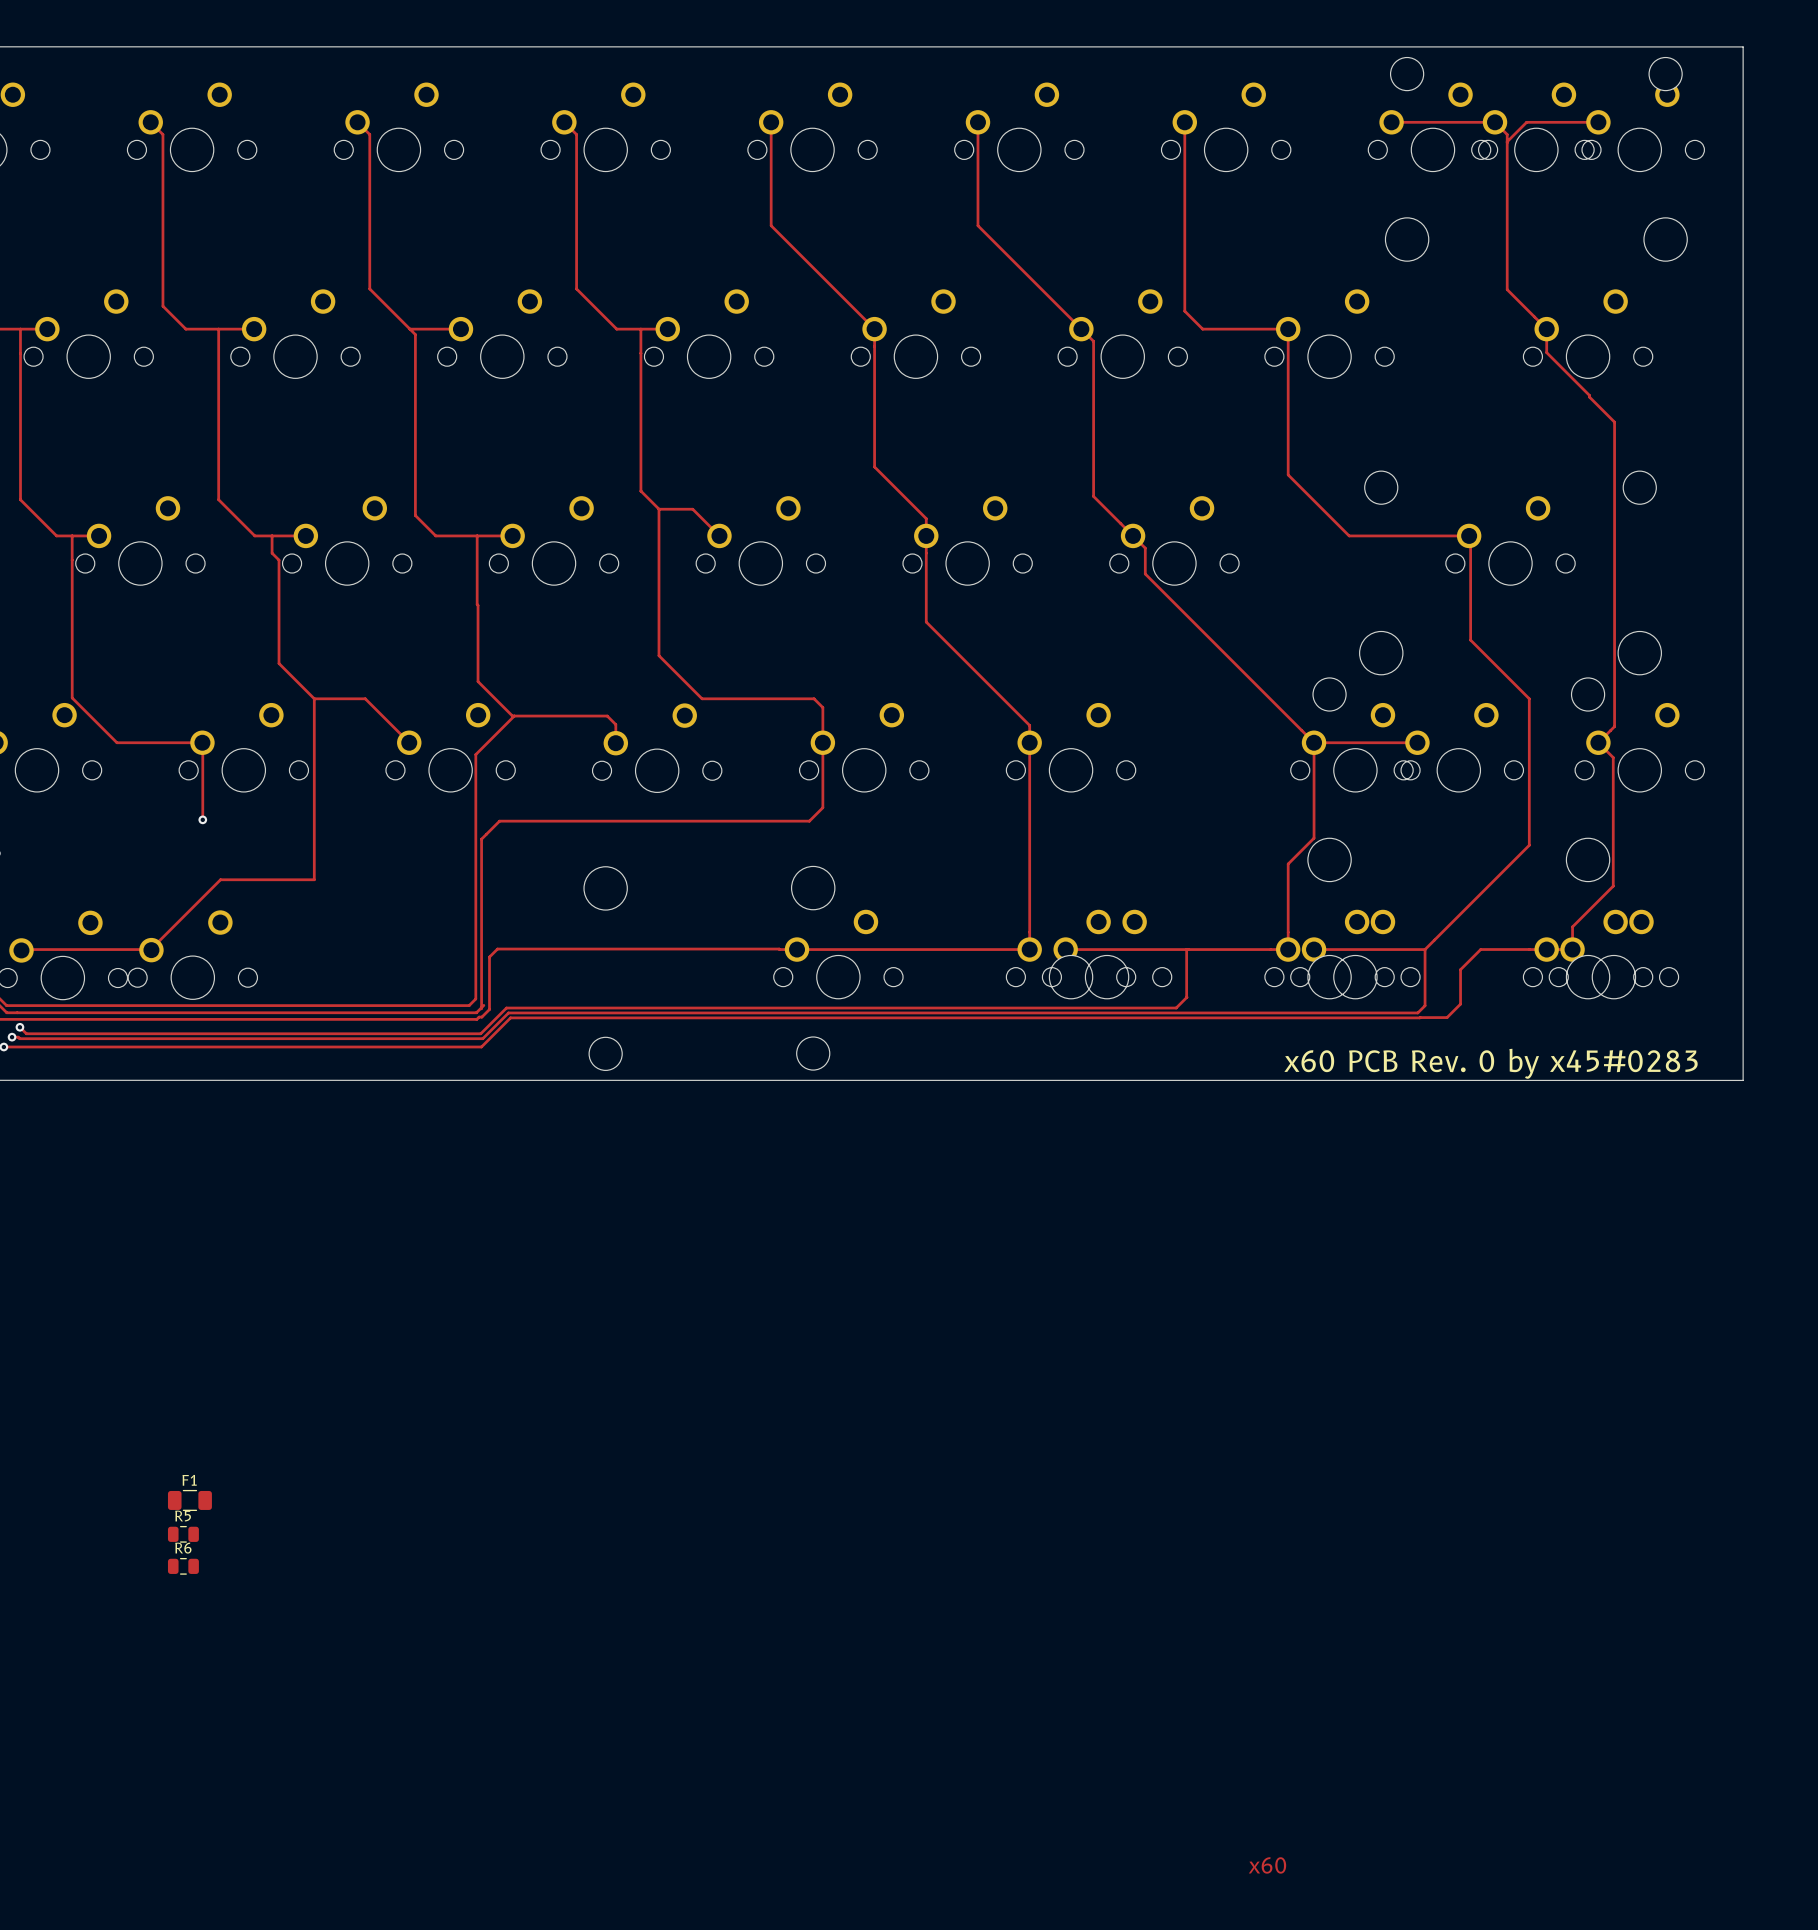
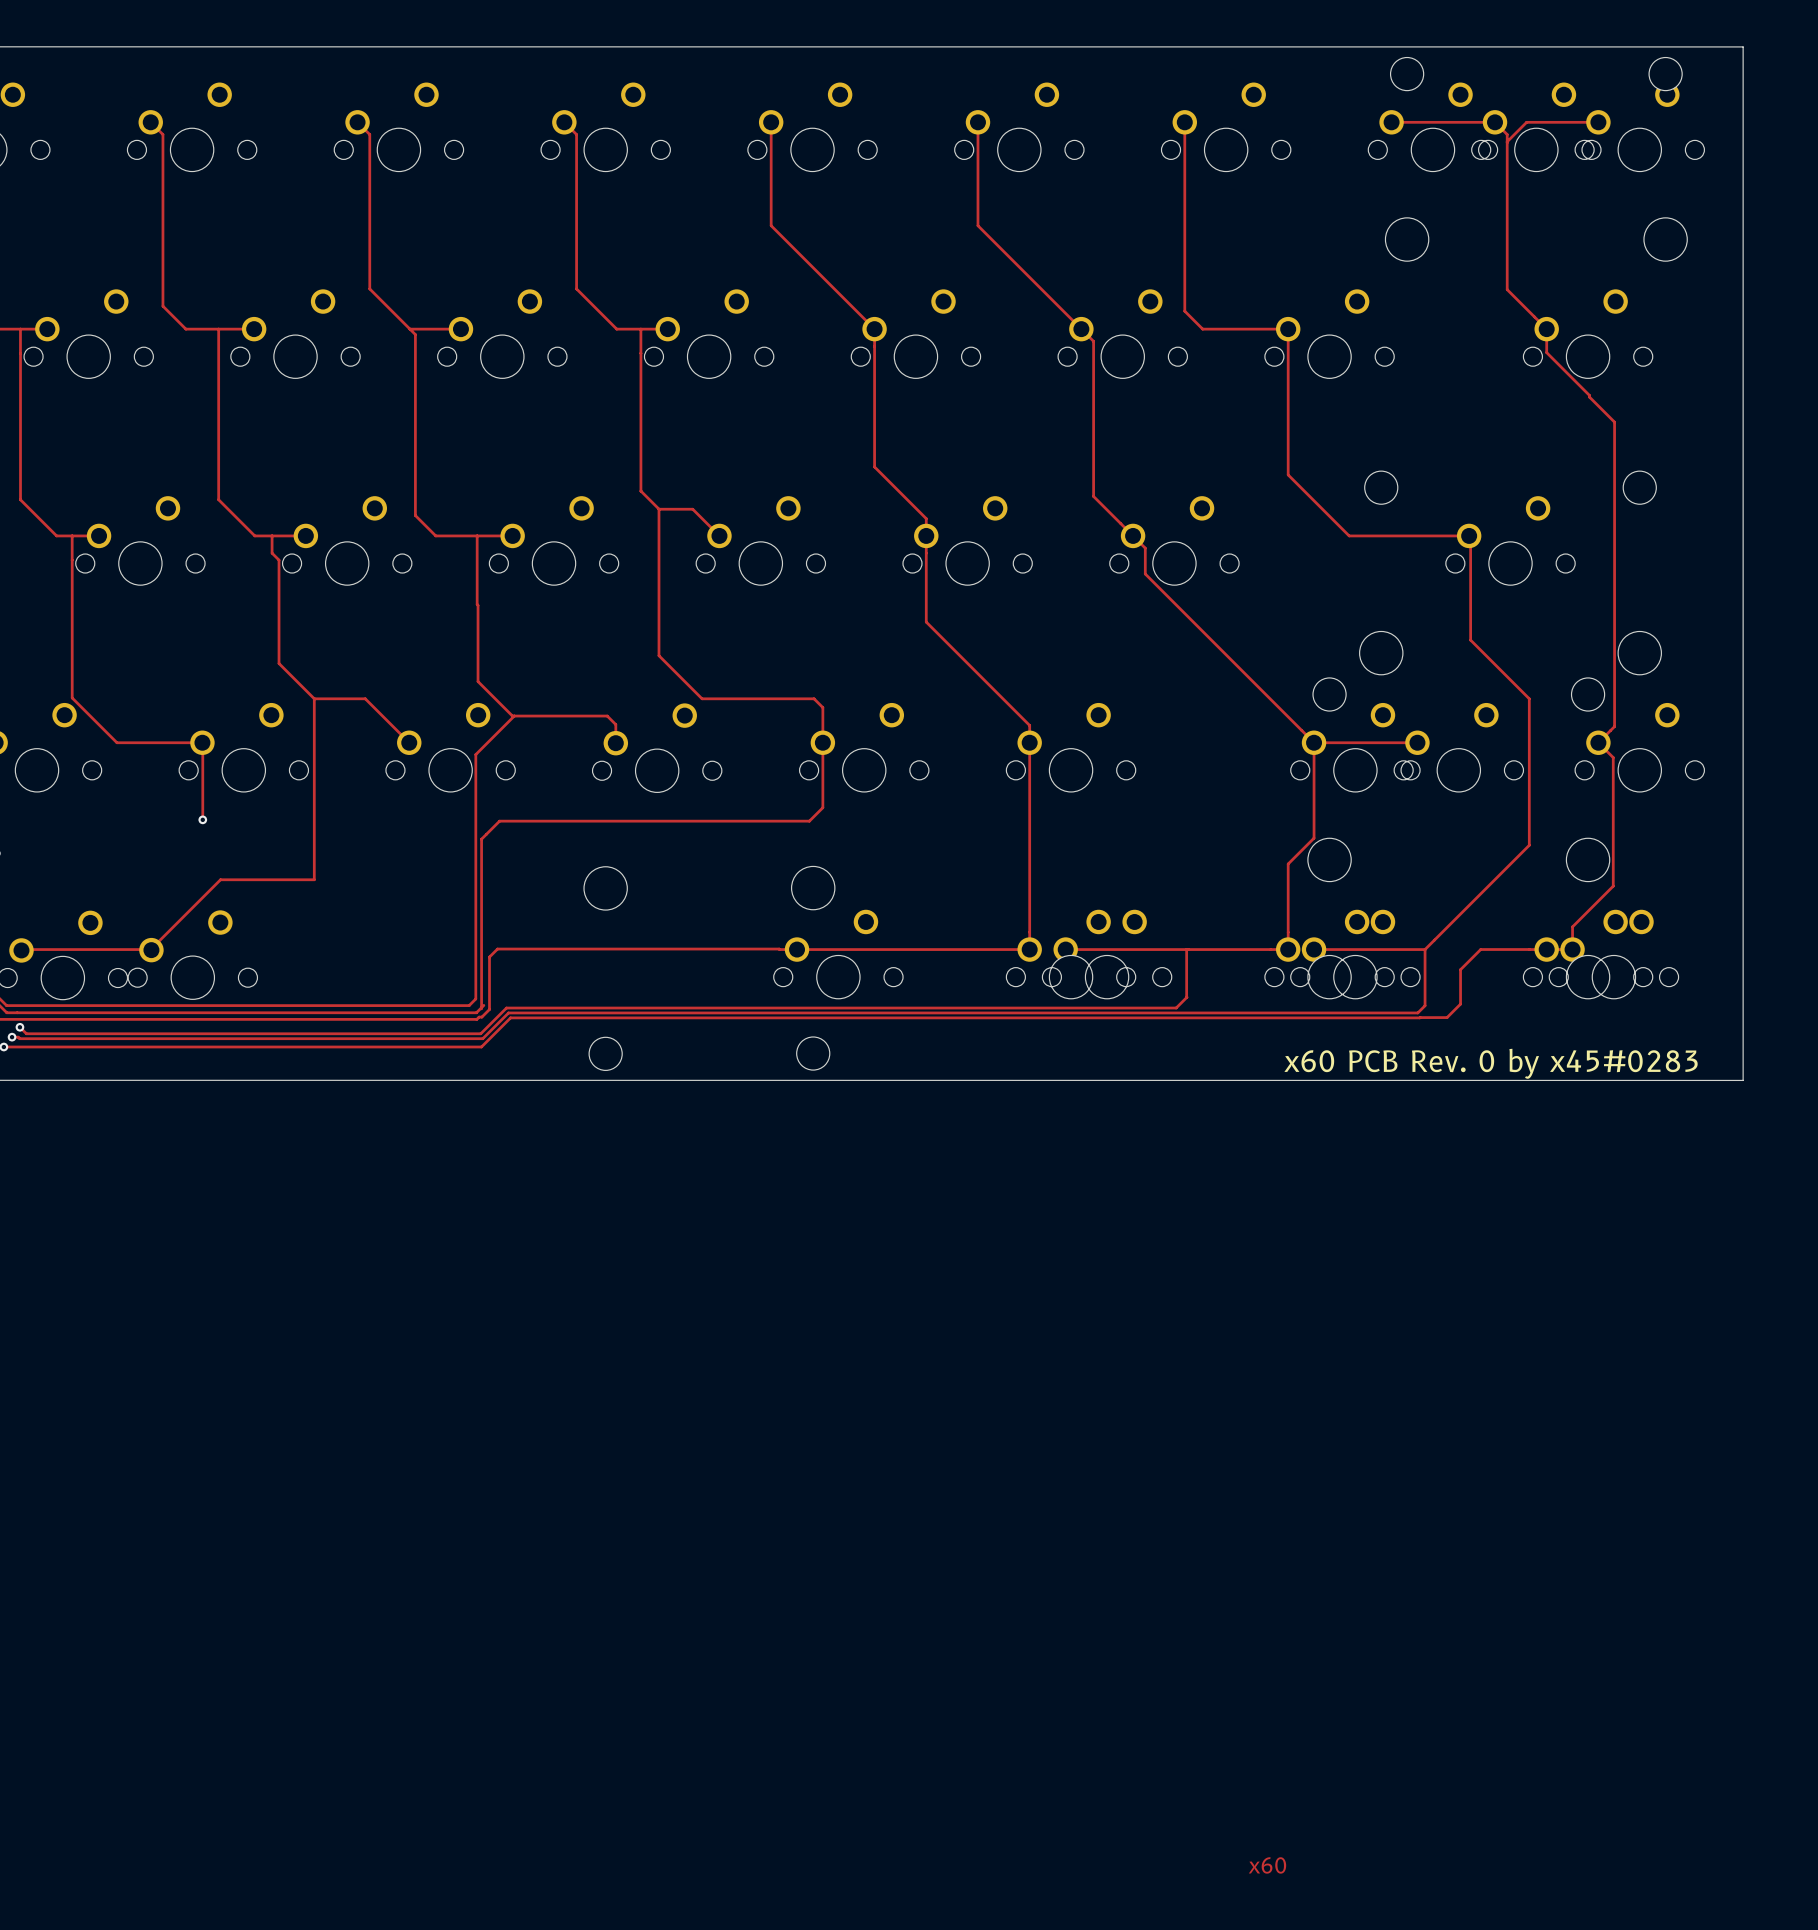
F1: (189, 1500) -> none
R5: (183, 1534) -> none
R6: (183, 1566) -> none

